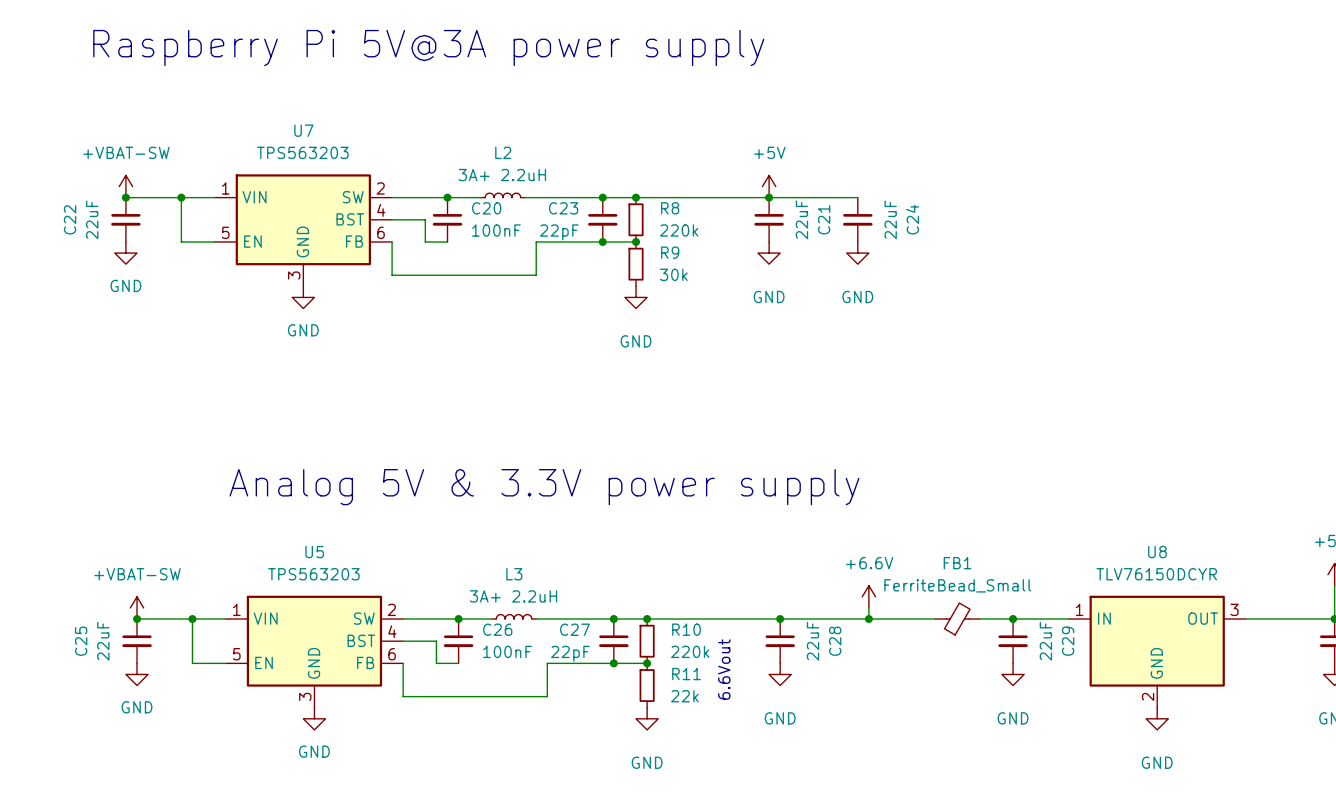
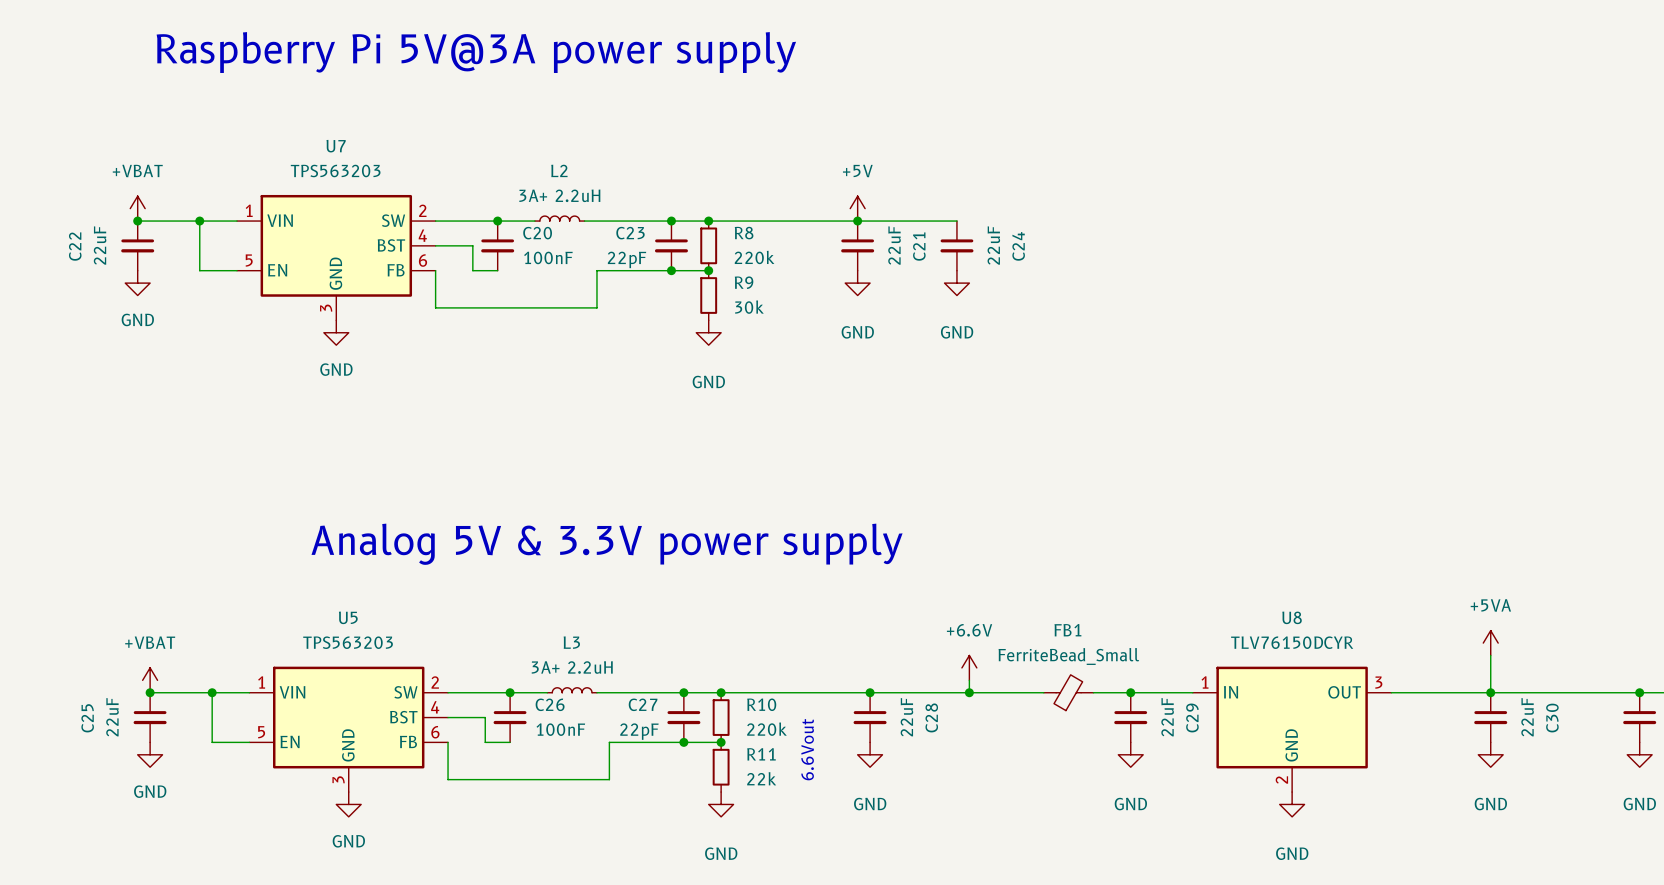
power symbol: +VBAT-SW (125, 186) -> +VBAT (137, 208)
power symbol: +VBAT-SW (137, 607) -> +VBAT (150, 680)

